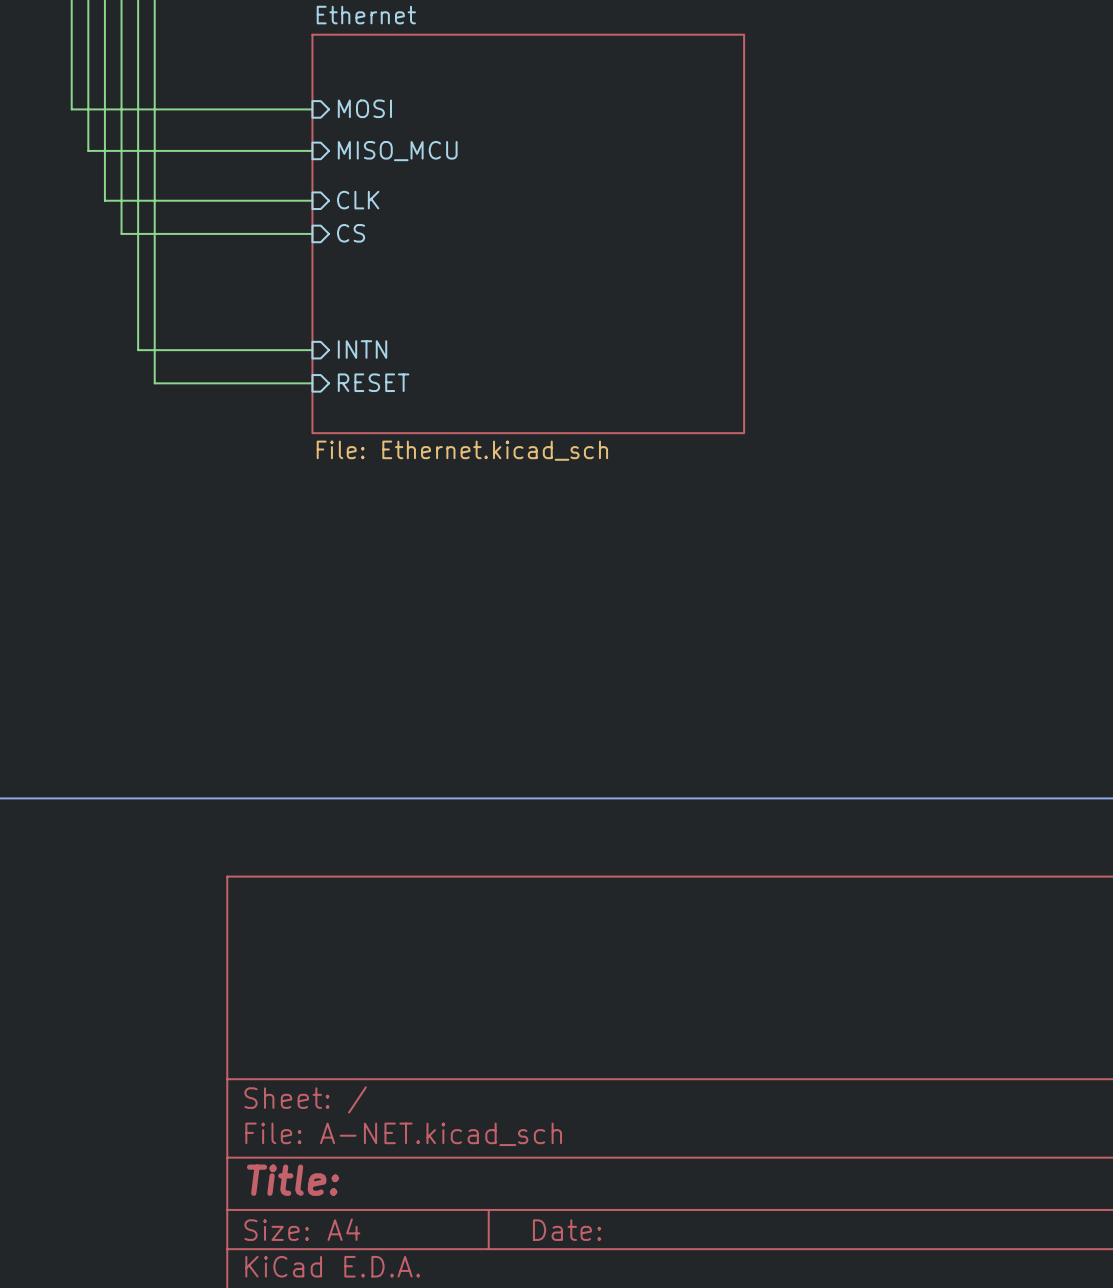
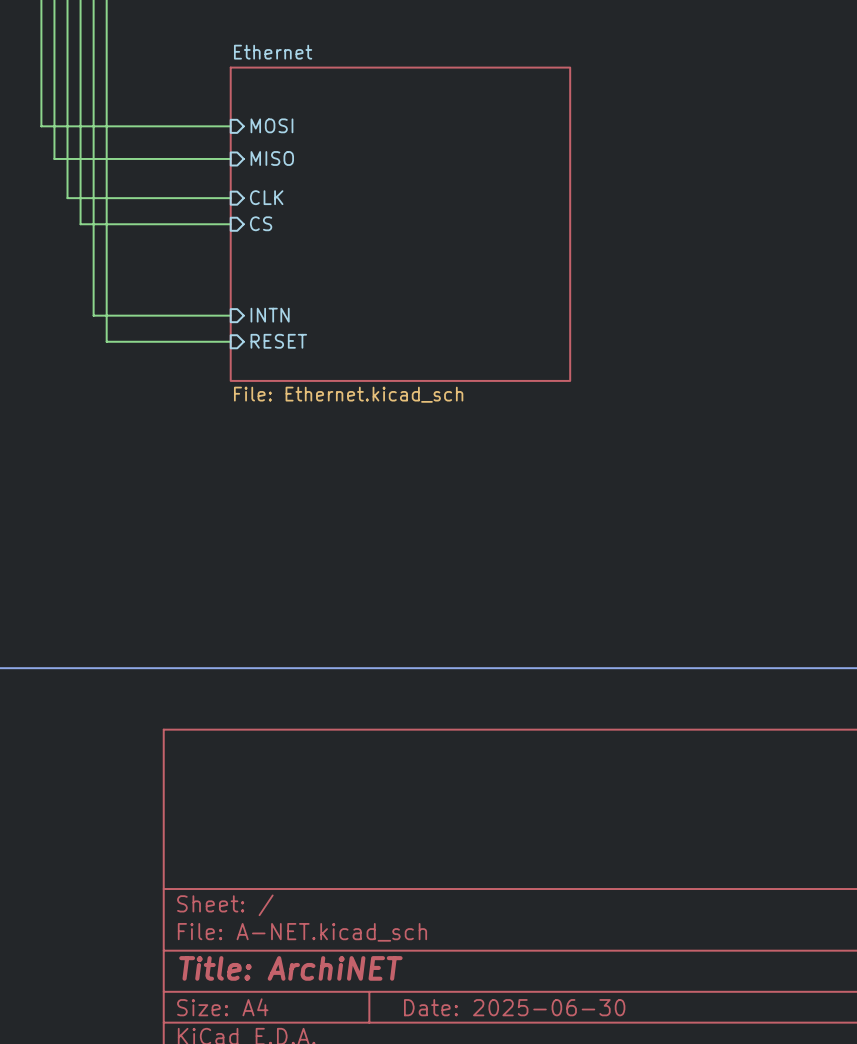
sheet pin: MISO_MCU (397, 151) -> MISO (272, 158)
title block: Title: (293, 1180) -> Title: ArchiNET (290, 968)
title block: Date: (567, 1230) -> Date: 2025-06-30 (514, 1007)

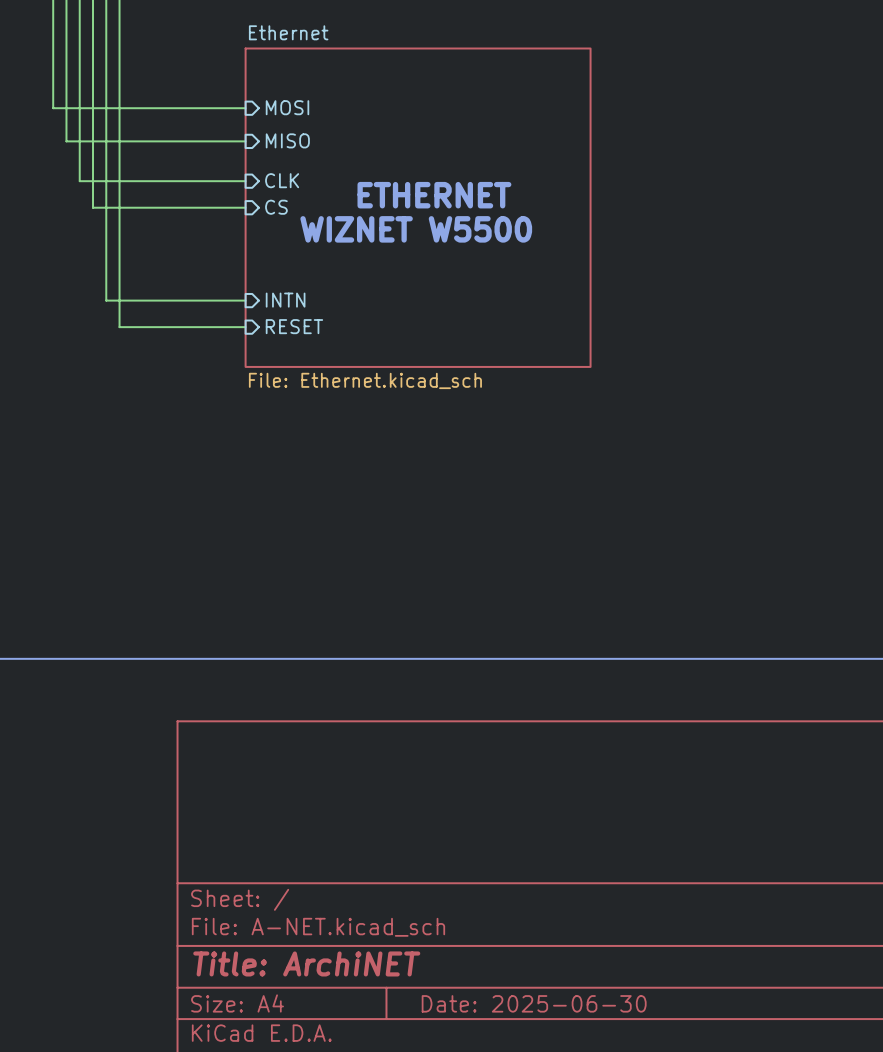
text: none -> ETHERNET (434, 195)
text: none -> WIZNET W5500 (416, 229)

